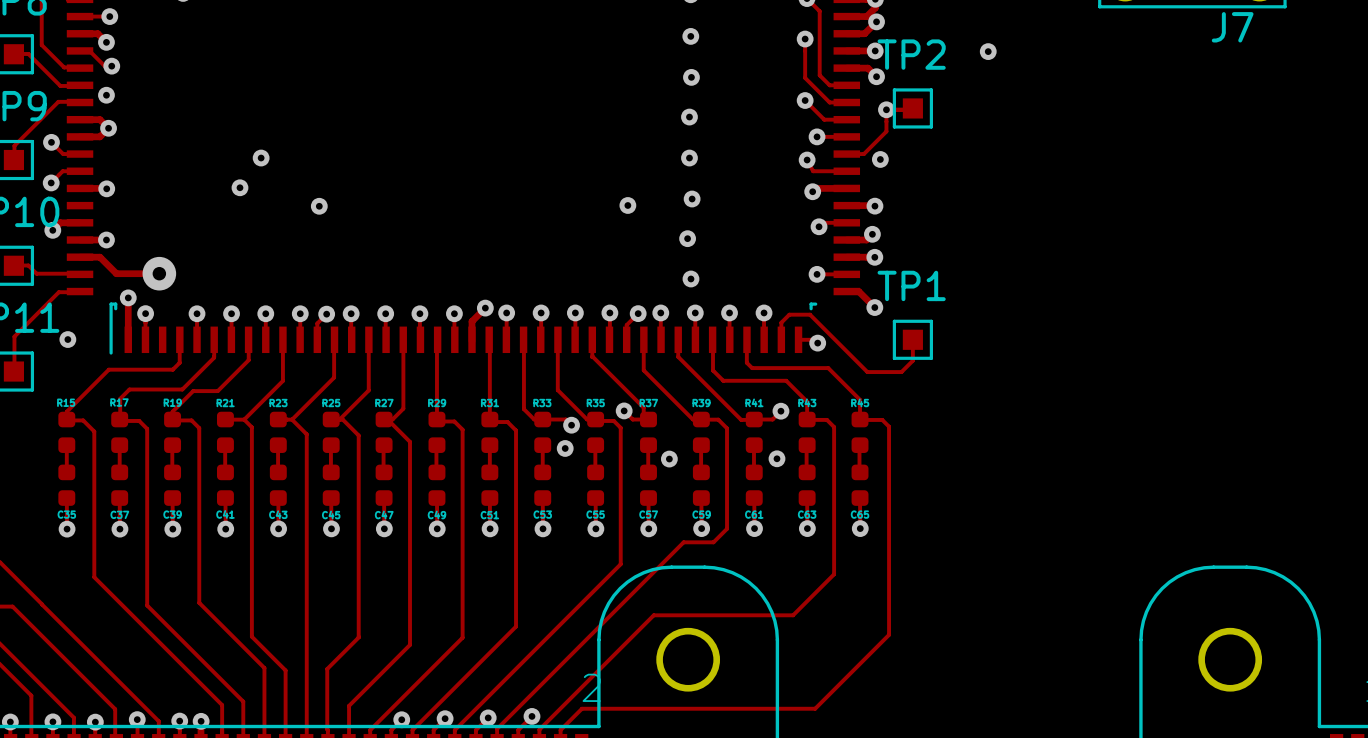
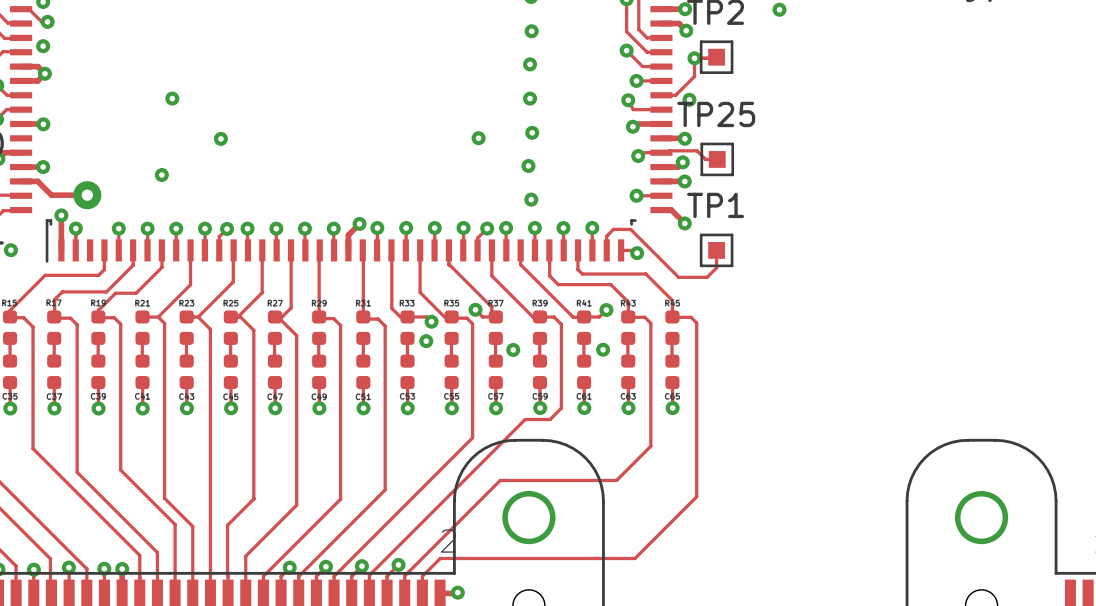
via position: (239, 187) -> (161, 175)
track: none -> (667, 153) (669, 150) (696, 150) (705, 159) (717, 159)
TP25: none -> (717, 159)

